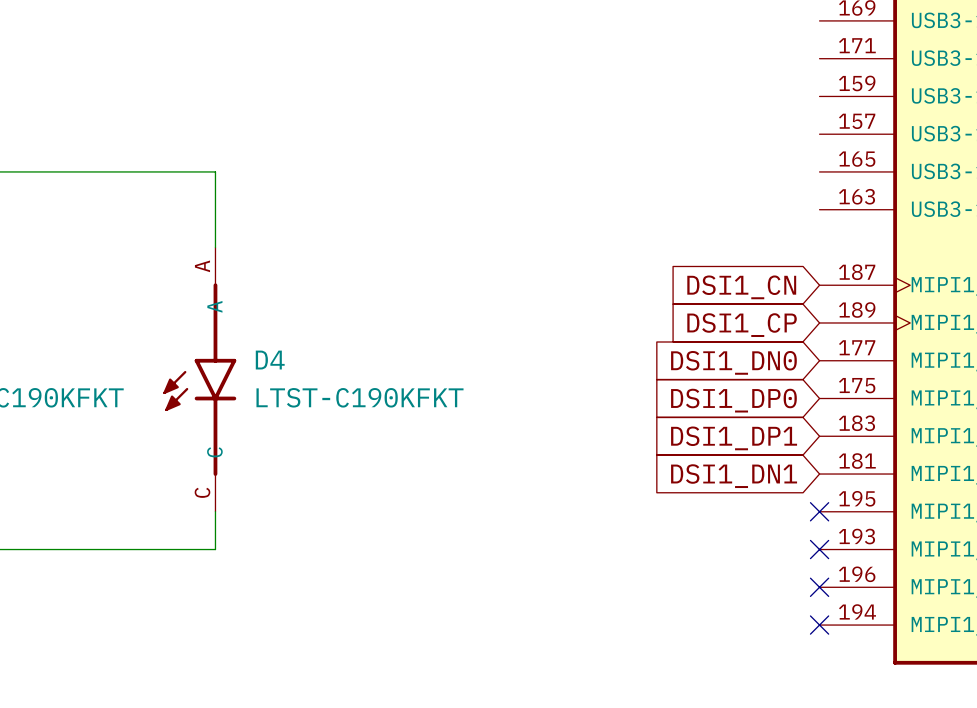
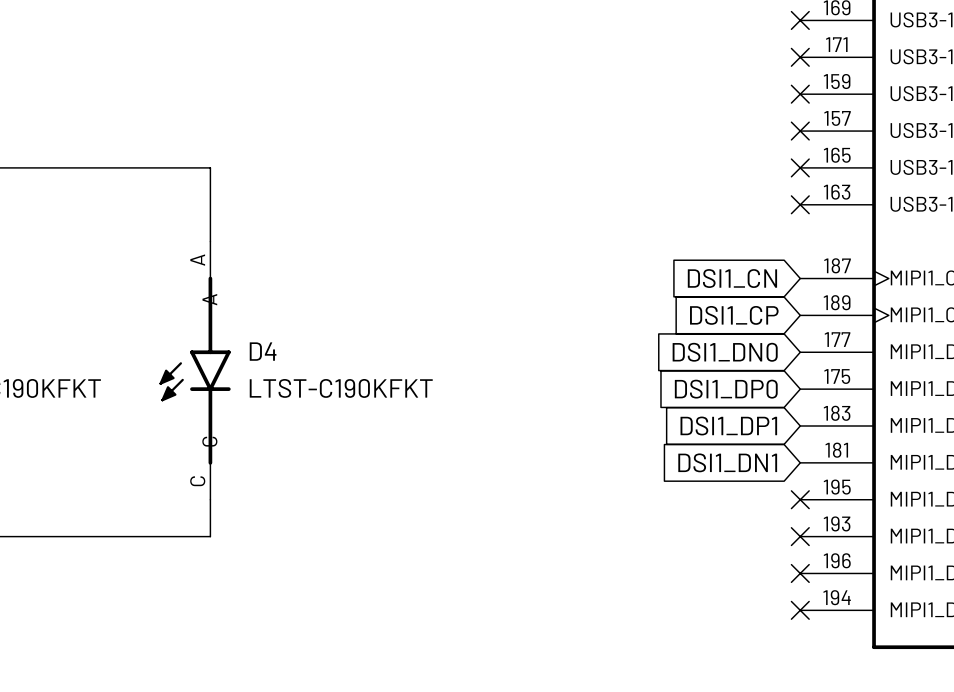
no-connect mark: none -> (800, 20)
no-connect mark: none -> (800, 57)
no-connect mark: none -> (800, 94)
no-connect mark: none -> (800, 131)
no-connect mark: none -> (800, 167)
no-connect mark: none -> (800, 204)

